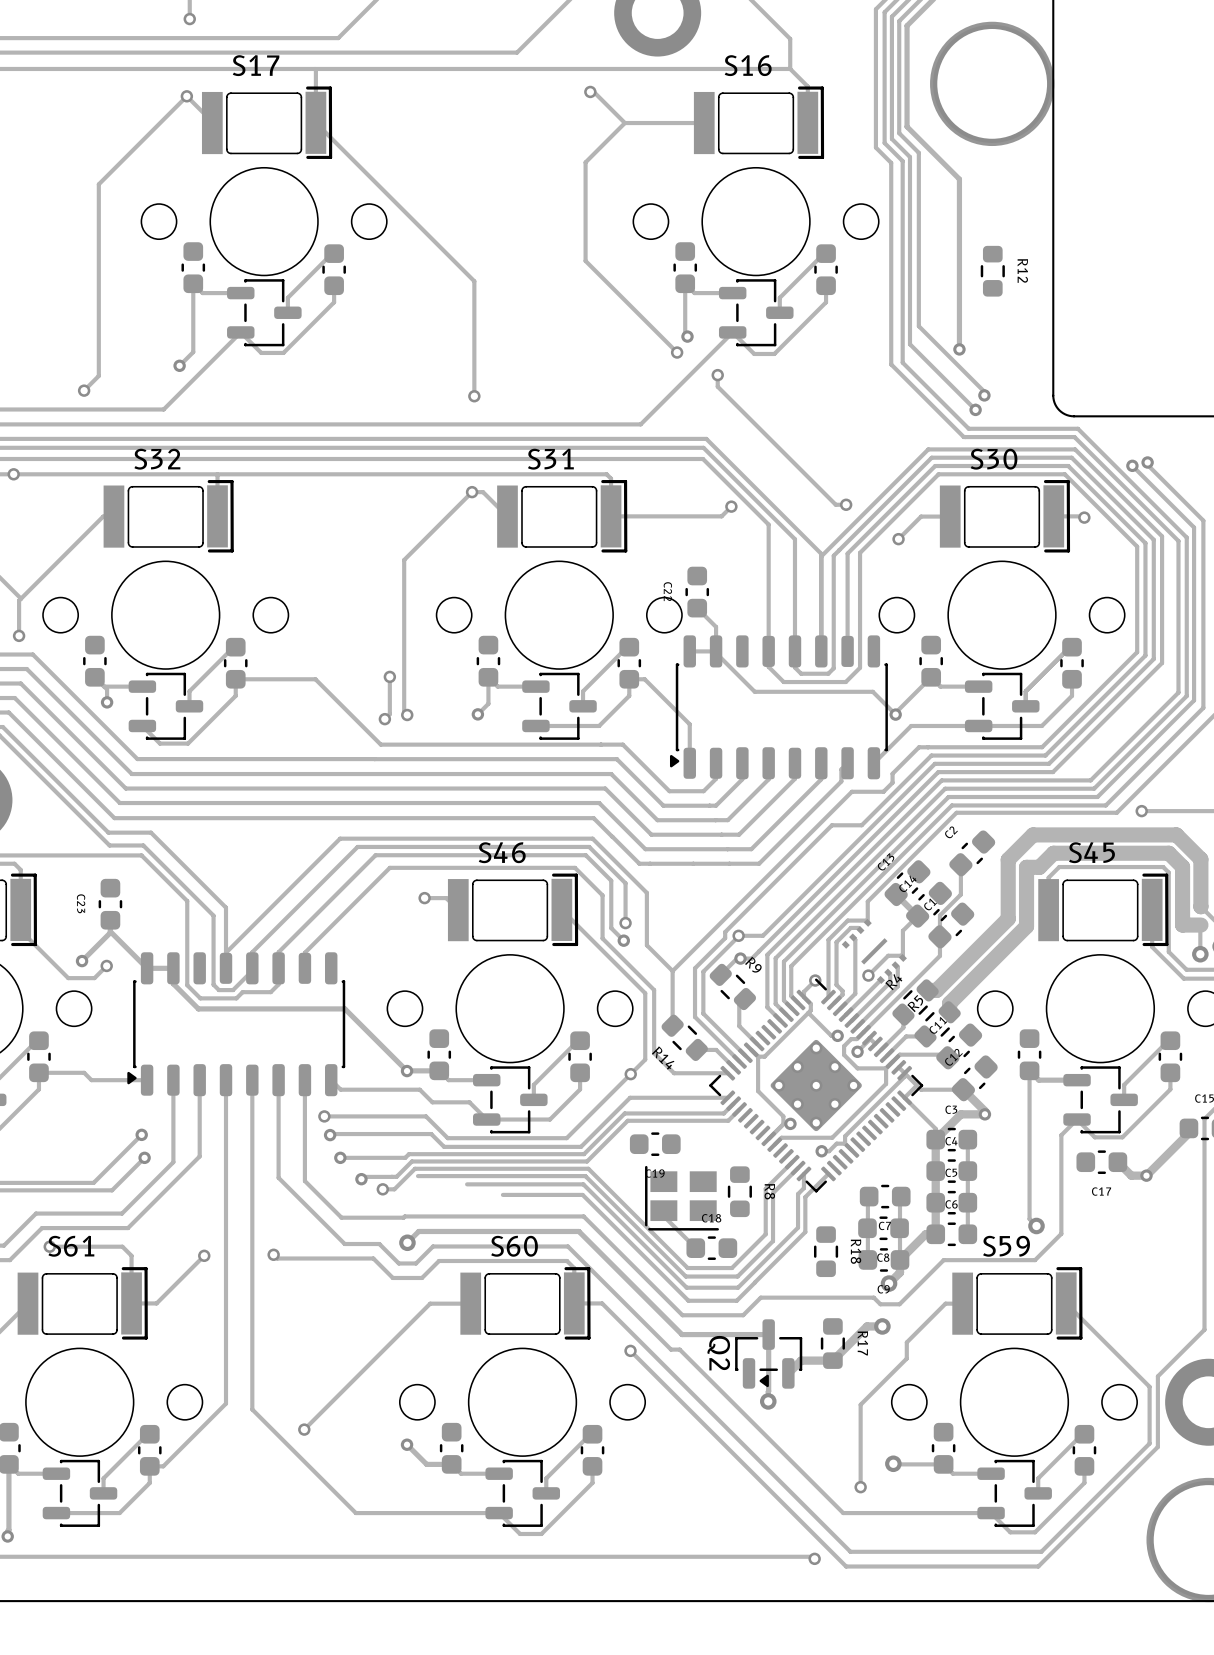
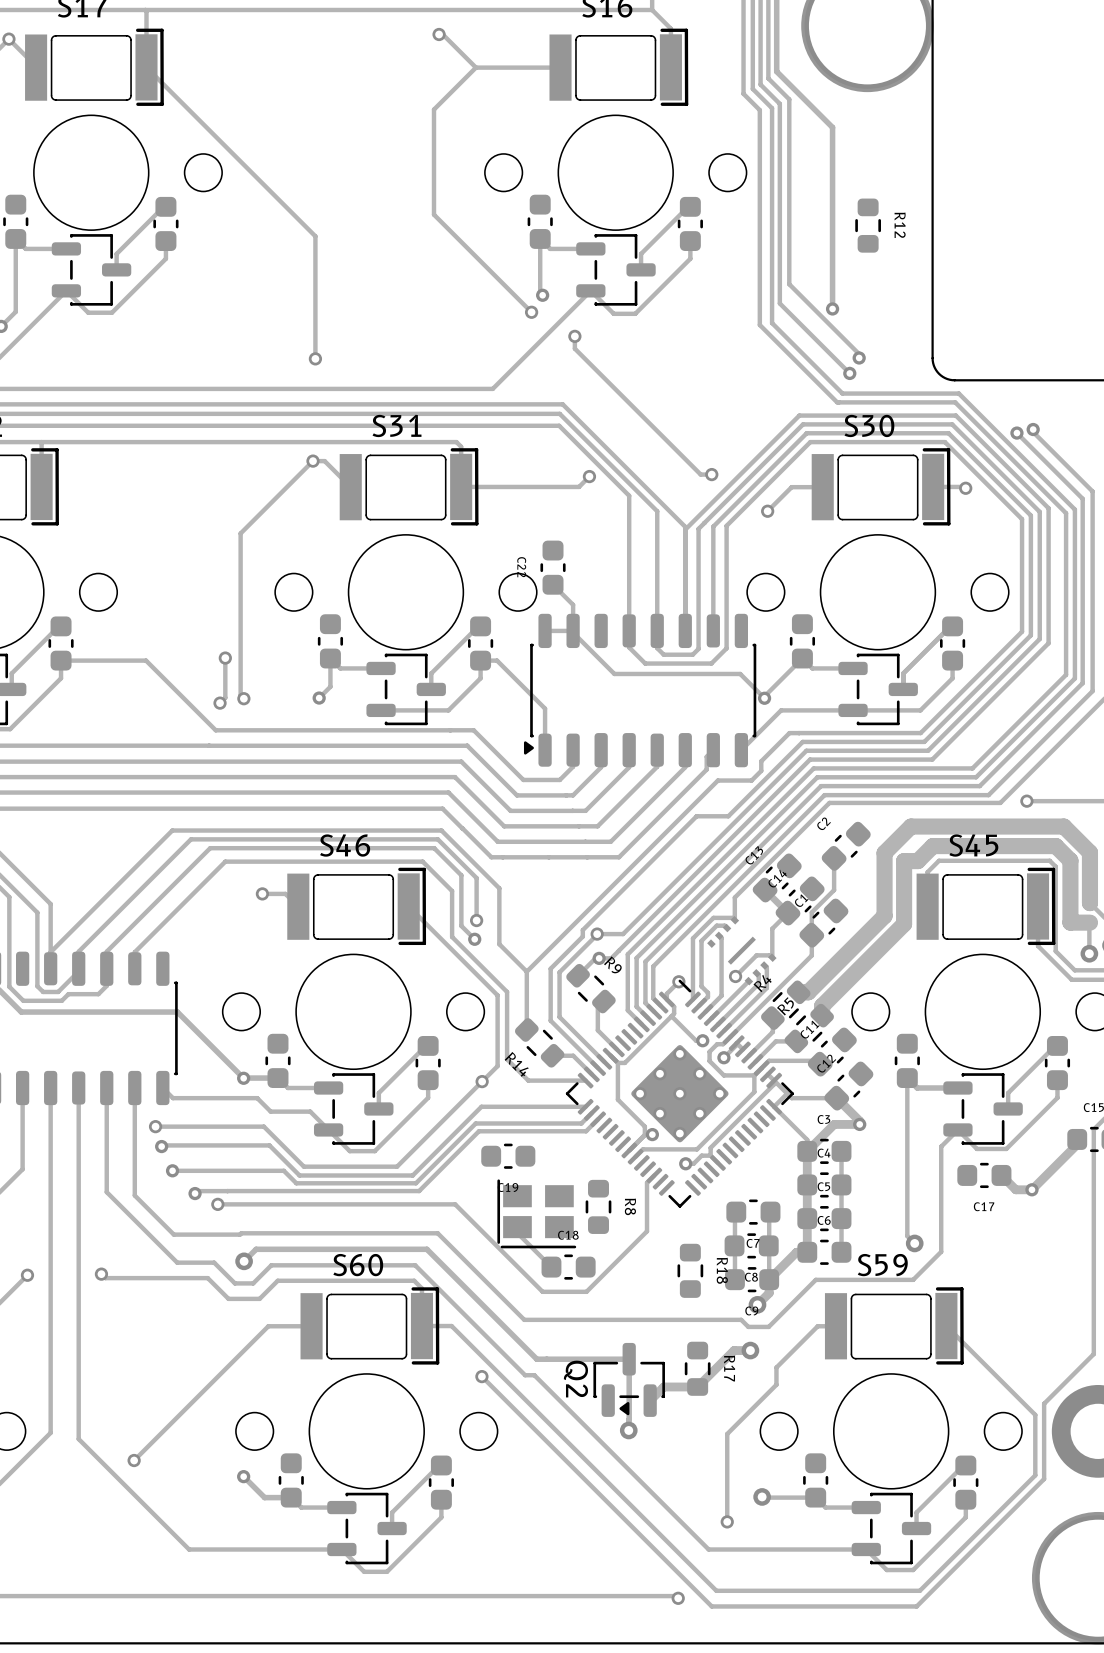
track: (549, 1119) (486, 1119) -> (396, 1129) (374, 1151) (349, 1151) (328, 1129)
track: (566, 1138) (447, 1138) -> (413, 1149) (397, 1166) (303, 1166) (287, 1149)
track: (581, 1146) (444, 1146) -> (429, 1159) (412, 1175) (299, 1175) (283, 1159)
track: (584, 1154) (408, 1154) (405, 1157) -> (432, 1166) (415, 1183) (296, 1183) (283, 1170) (241, 1170)
track: (587, 1161) (411, 1161) (396, 1176) -> (435, 1174) (419, 1191) (232, 1191)
track: (798, 1168) (773, 1193) (773, 1241) (737, 1276) (685, 1276) (585, 1176) (418, 1176) -> none
track: (785, 1169) (765, 1188) (765, 1234) -> (647, 1182) (647, 1231) (626, 1252)
track: (803, 1173) (803, 1188) (798, 1194) (798, 1227) (738, 1287) (686, 1287) (583, 1184) (467, 1184) -> none
track: (828, 1173) (805, 1197) (805, 1232) (736, 1300) (688, 1300) (582, 1194) (502, 1194) -> none
track: (394, 1189) (414, 1168) (588, 1168) (687, 1268) (731, 1268) -> (230, 1204) (455, 1204) (542, 1291) (586, 1291) (590, 1288)
track: (583, 1216) (682, 1315) (743, 1315) (760, 1297) -> (432, 1233) (437, 1233) (524, 1319) (620, 1319)

